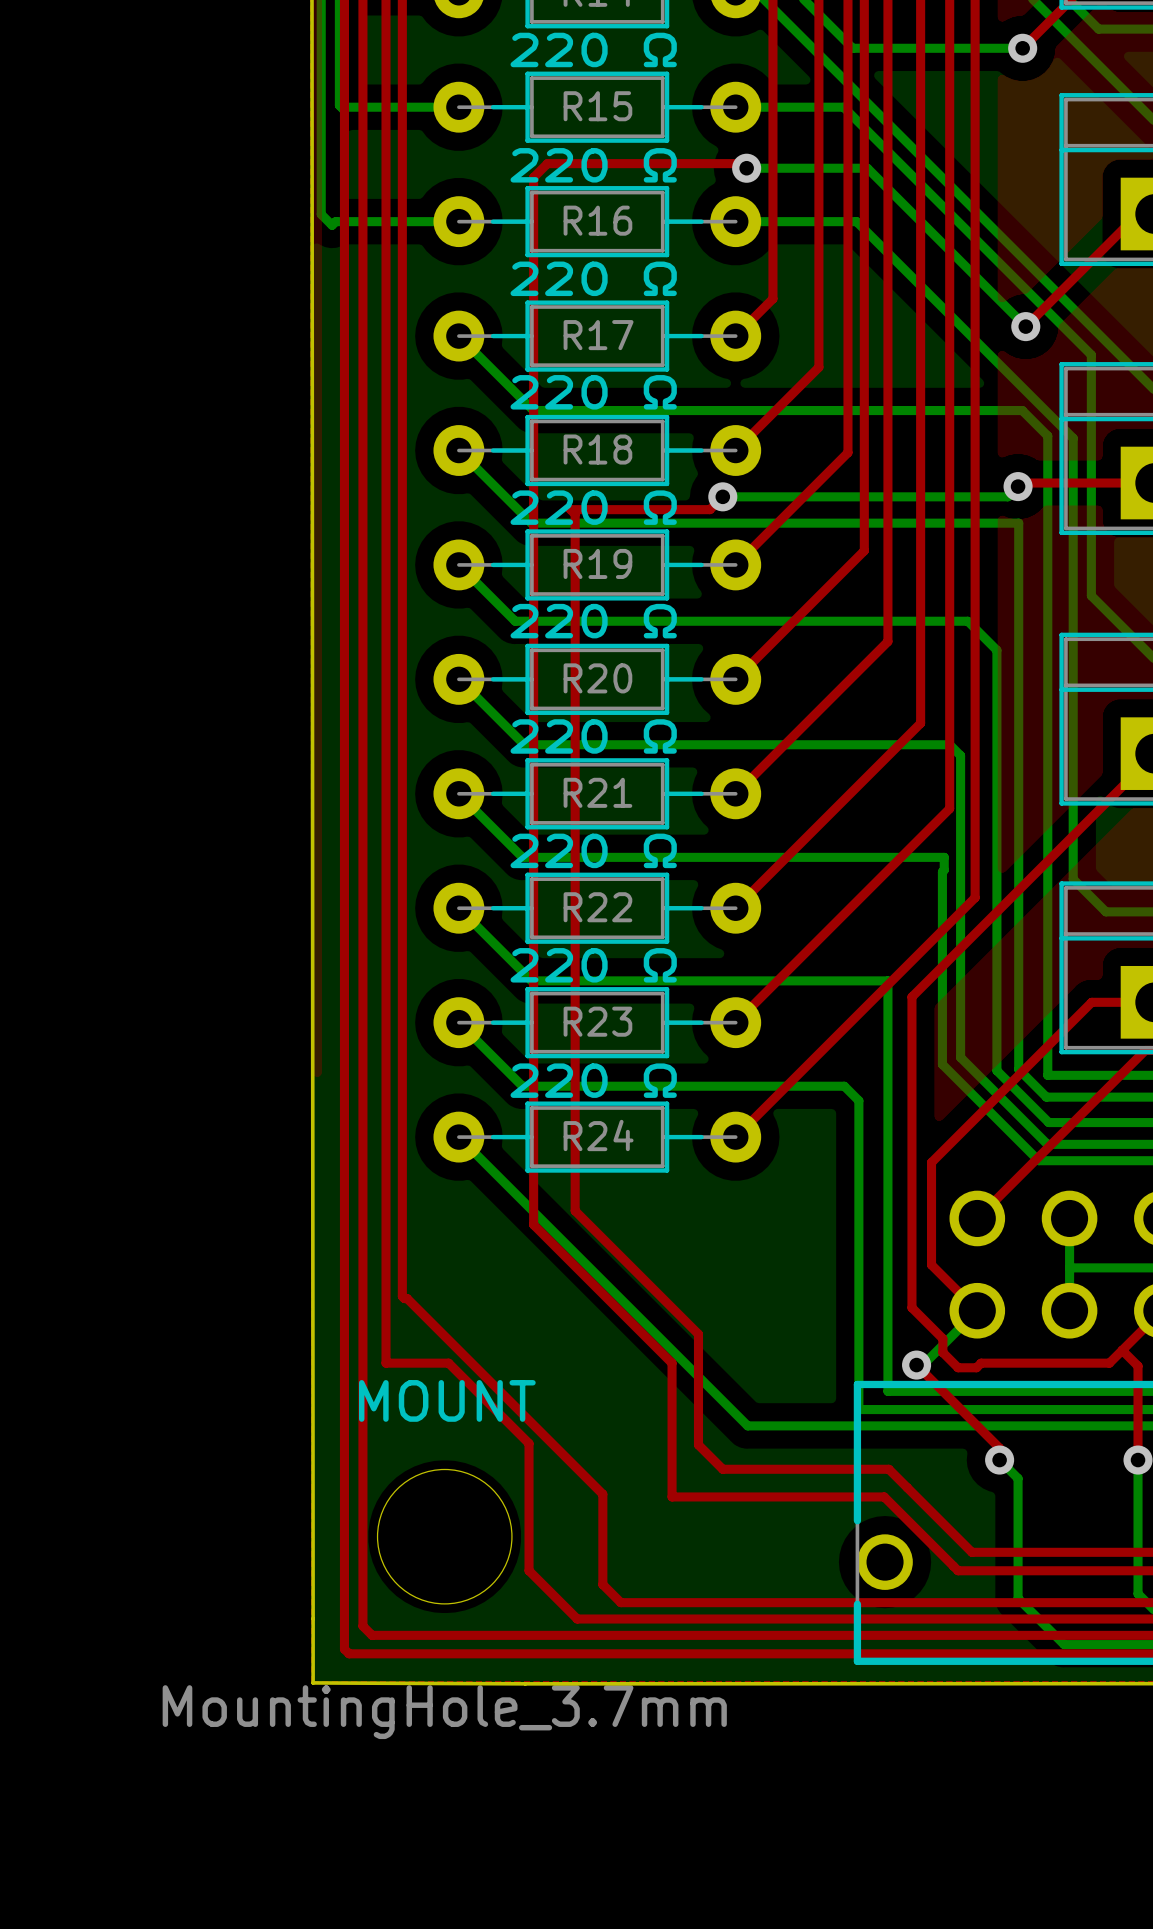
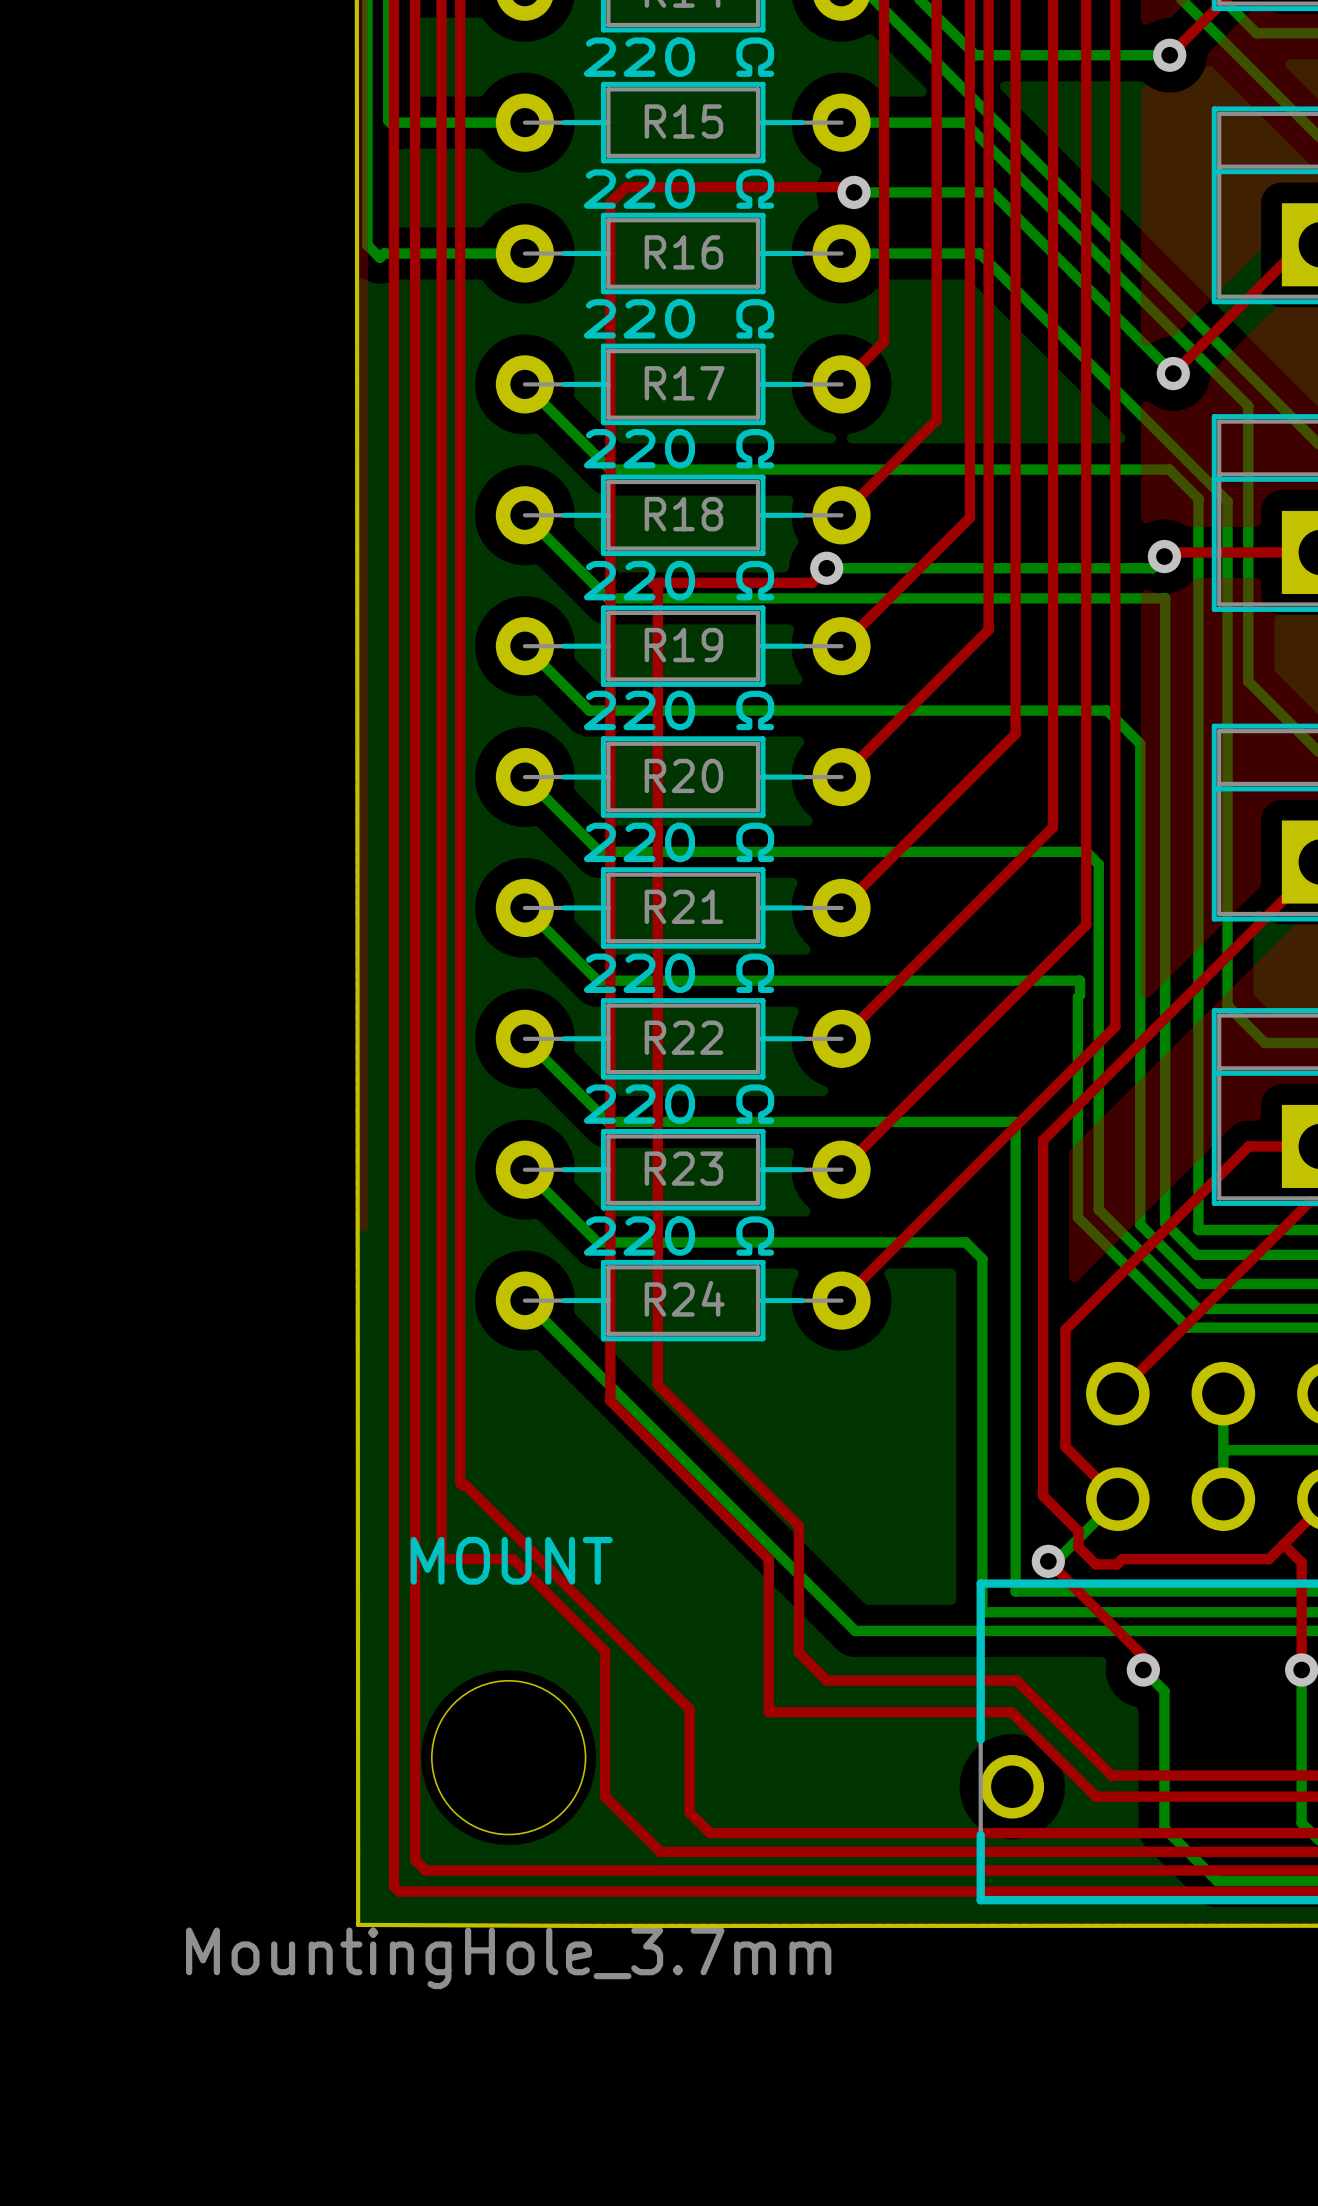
MOUNT name position: MOUNT (447, 1400) -> MOUNT (511, 1560)

